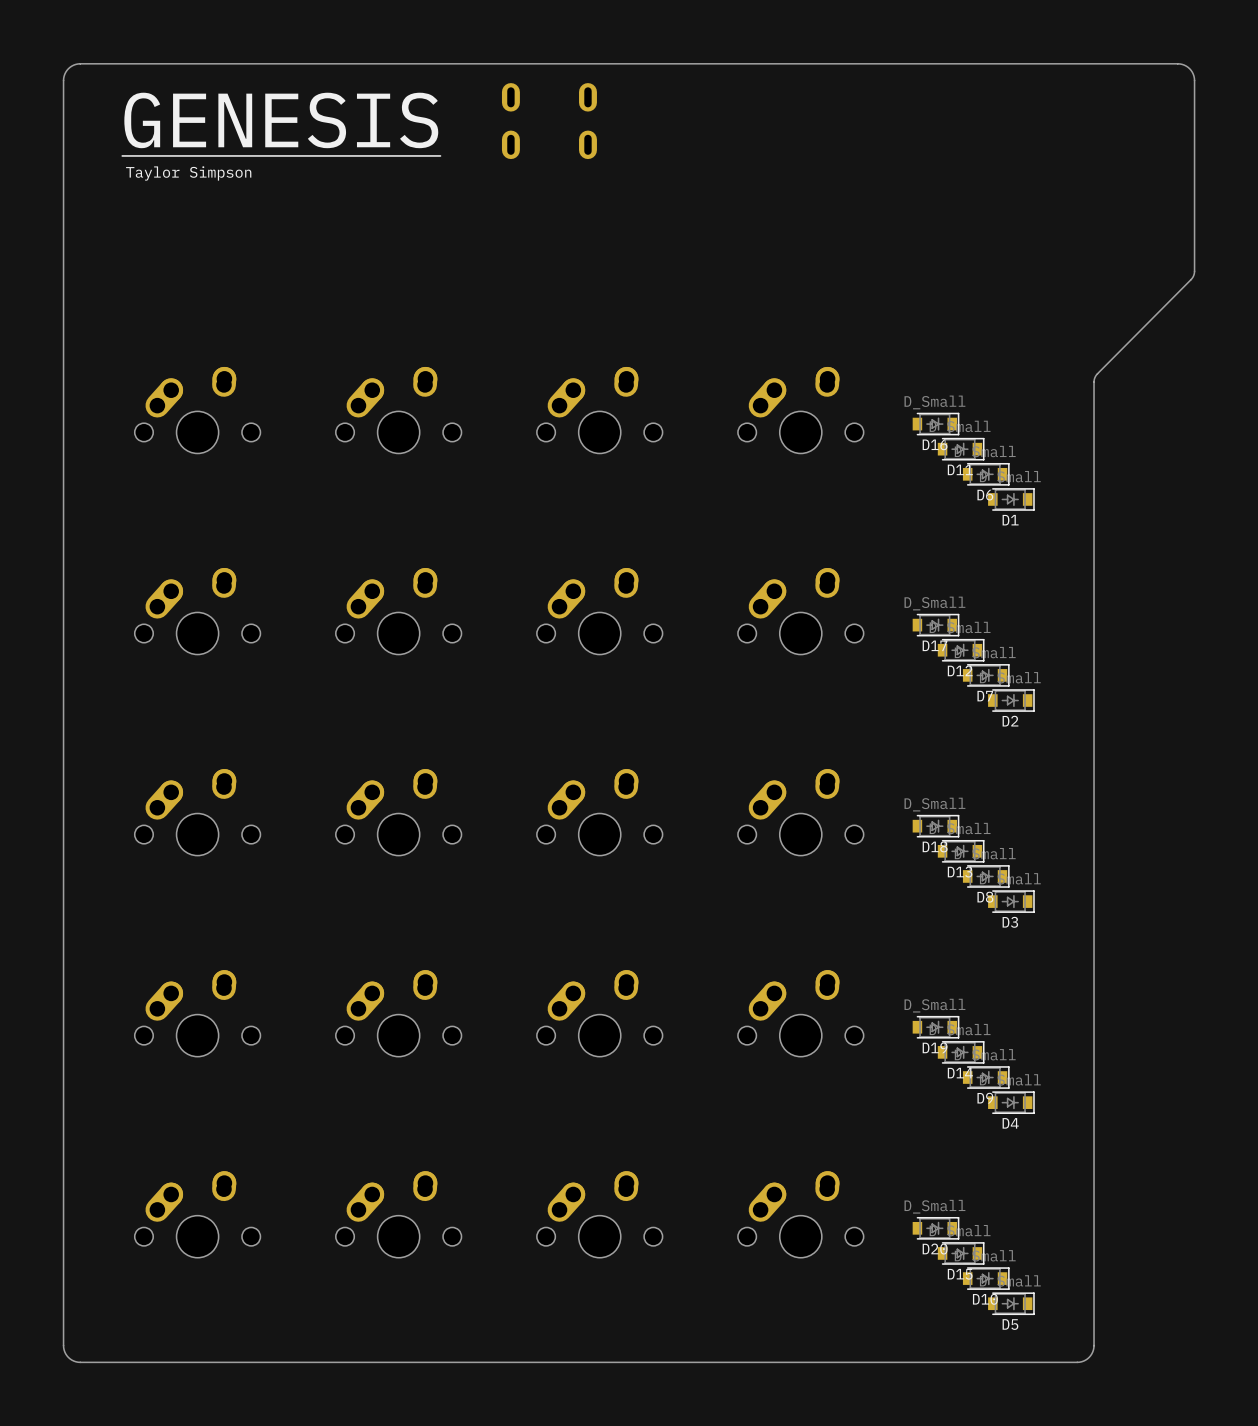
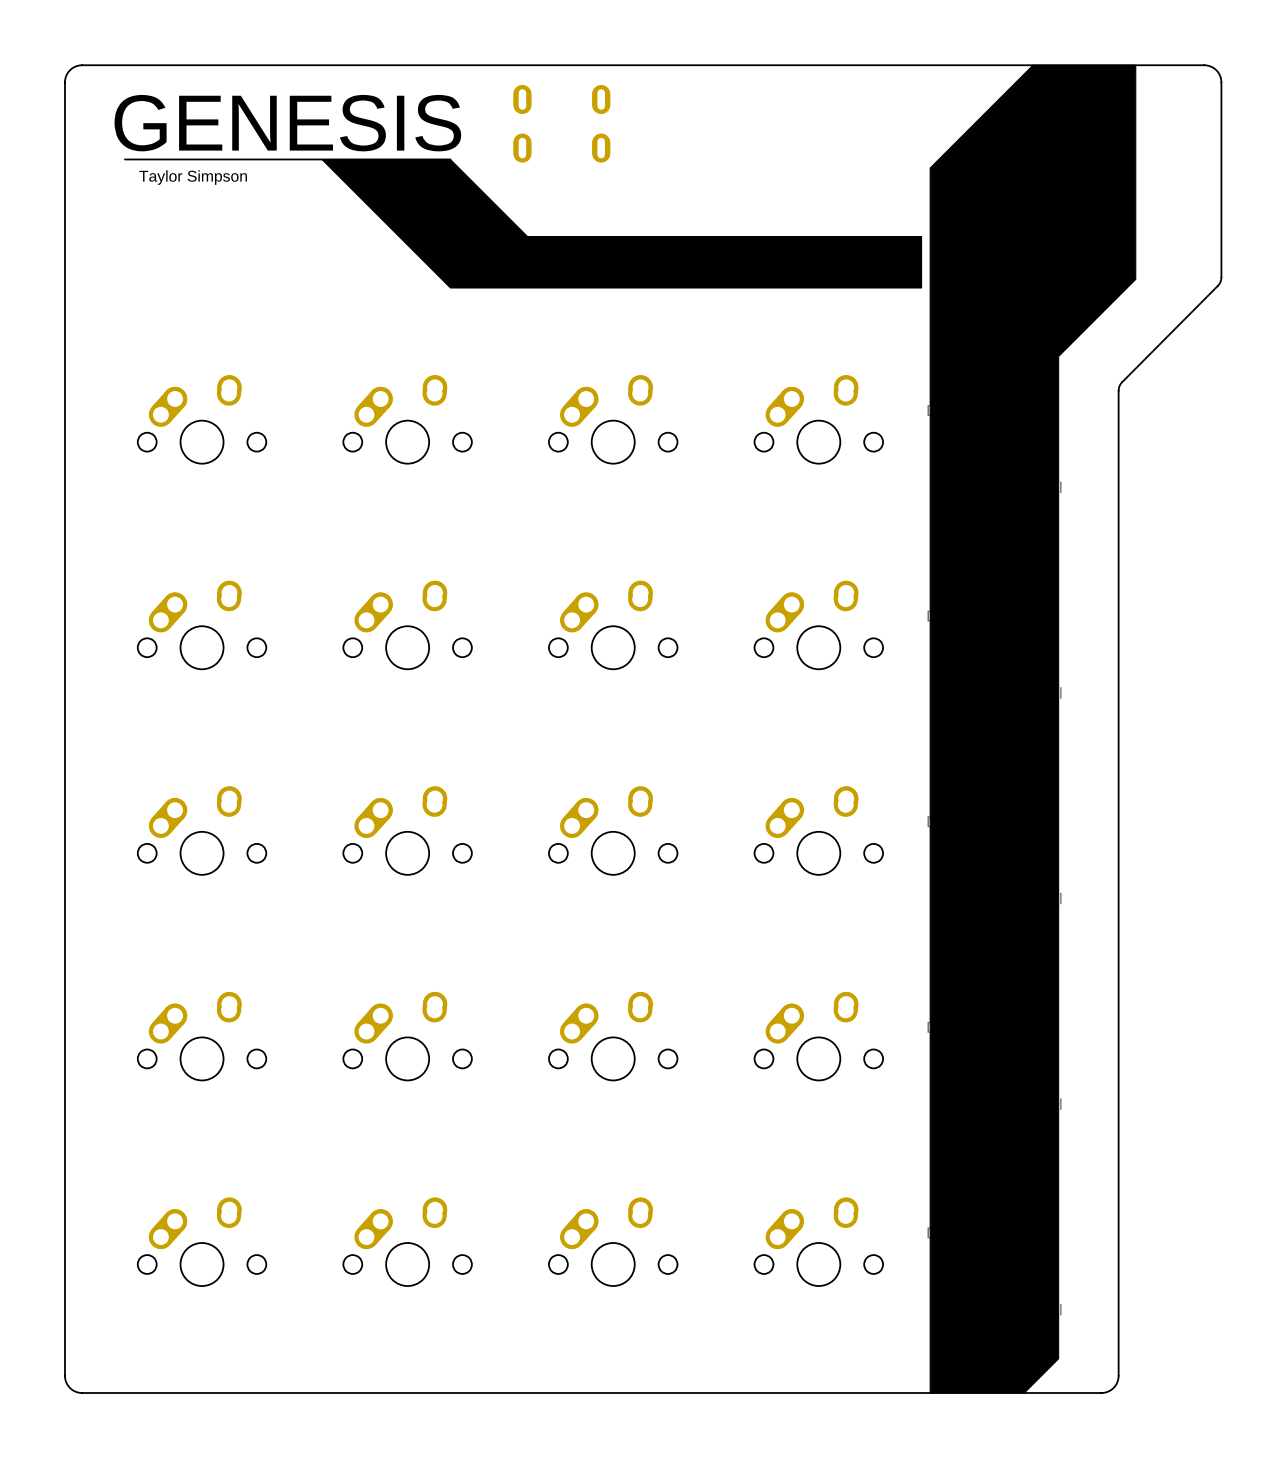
drawing: none -> [321, 64, 1137, 1394]

